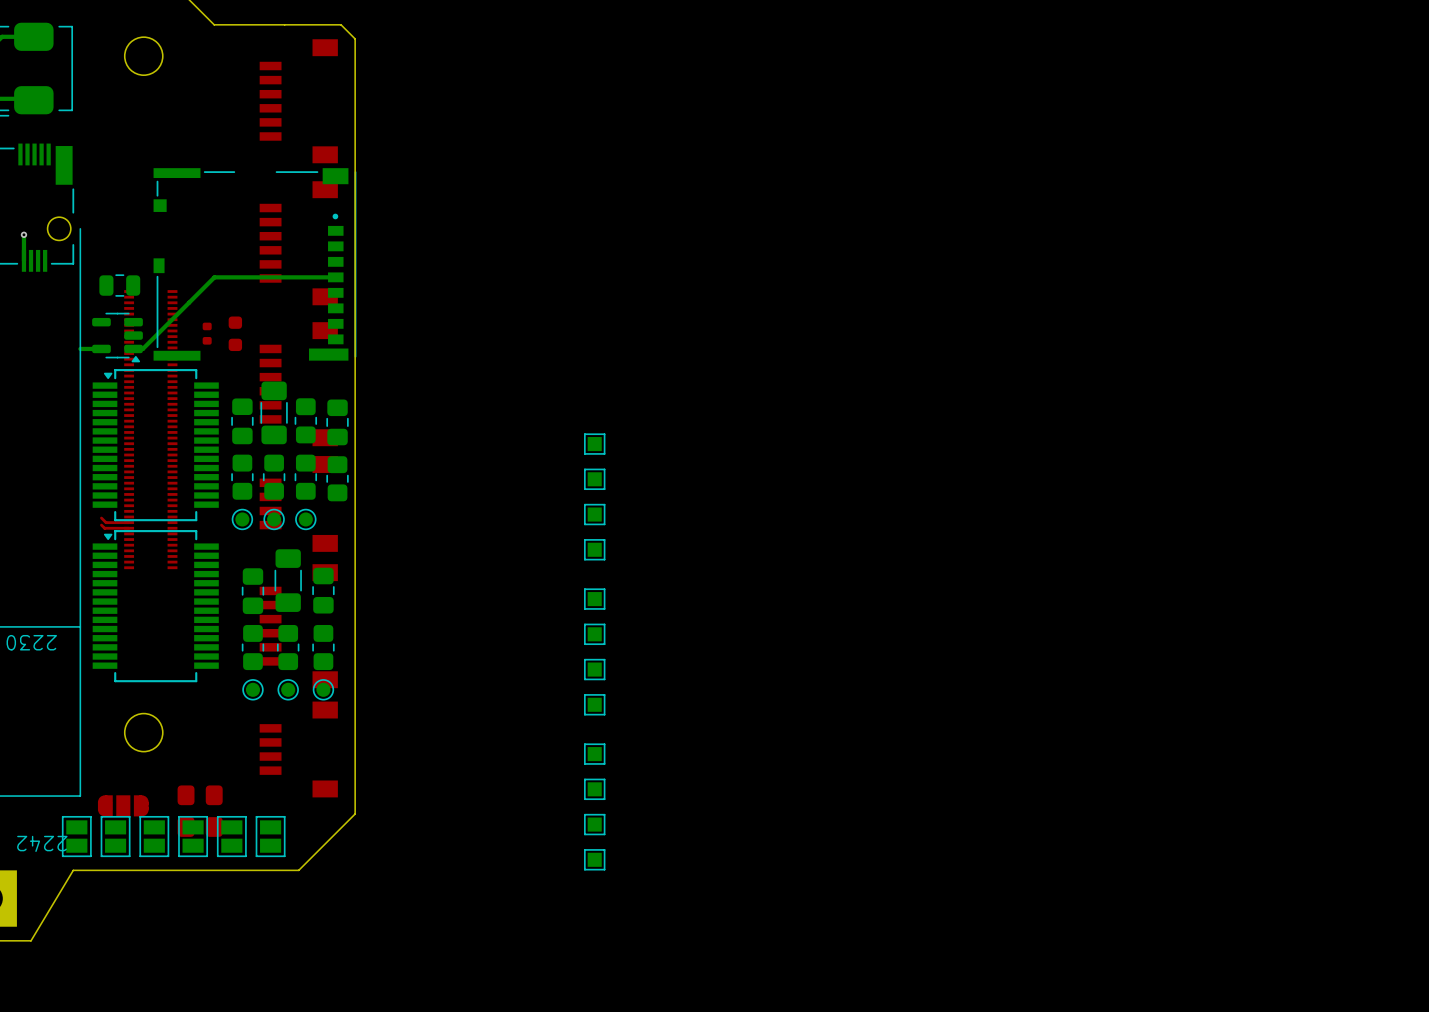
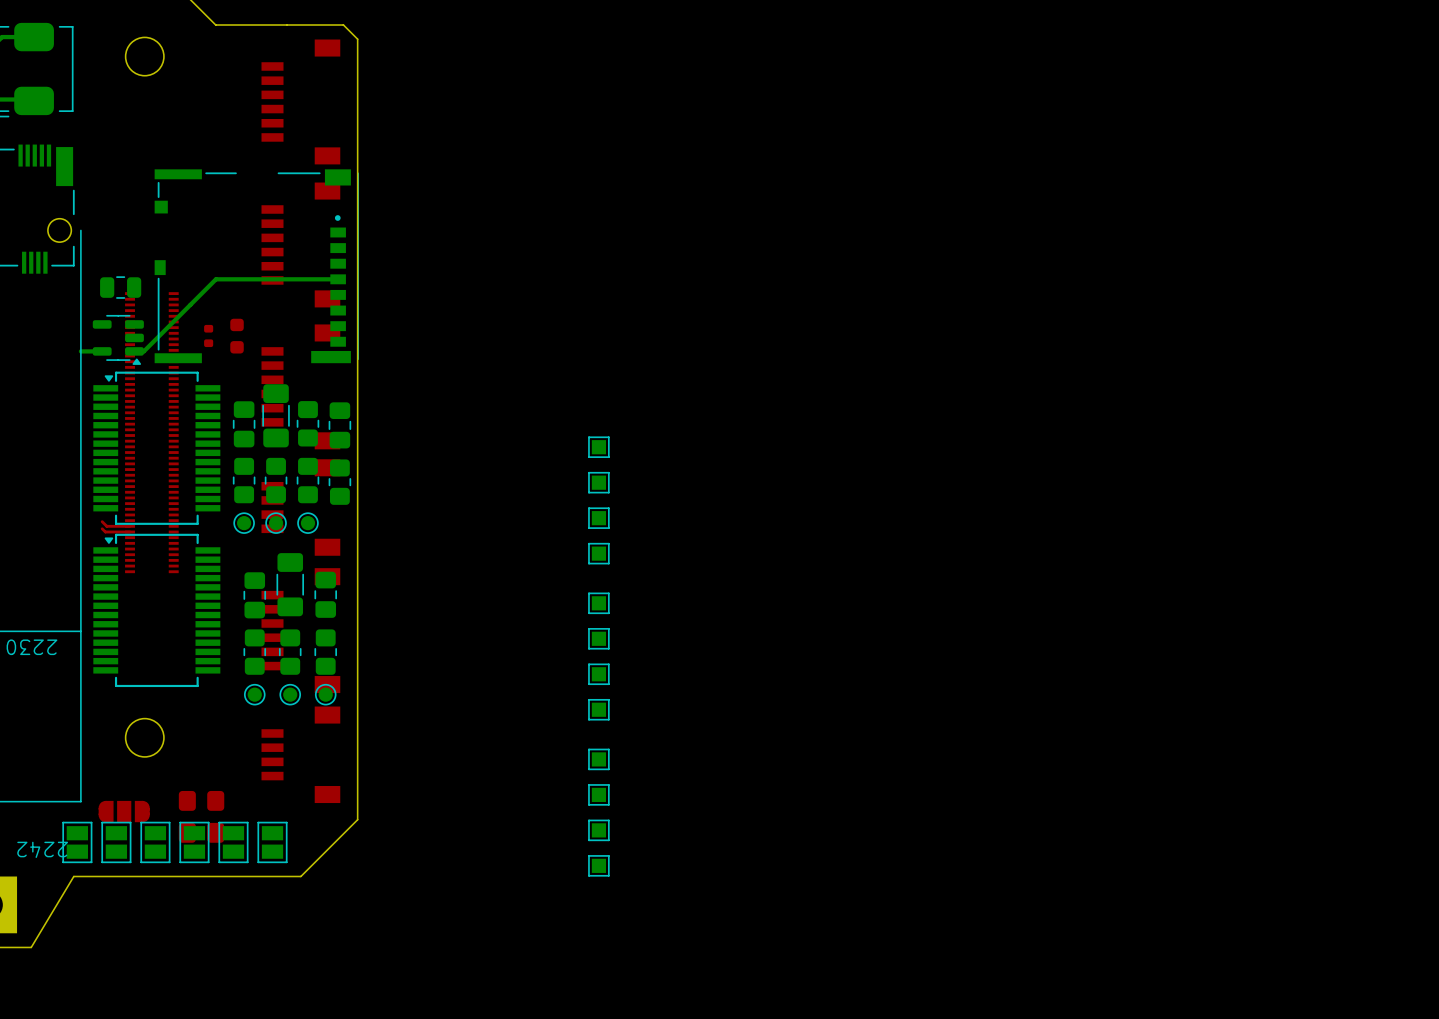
bottom track: (23, 234) (23, 260) -> none
via: (23, 234) -> none

